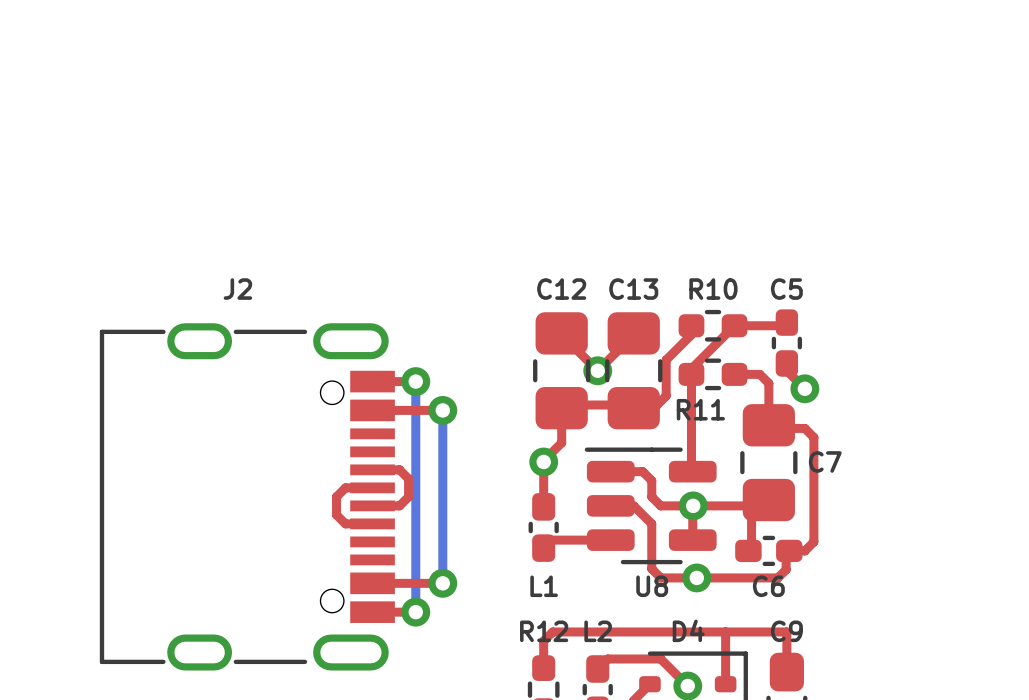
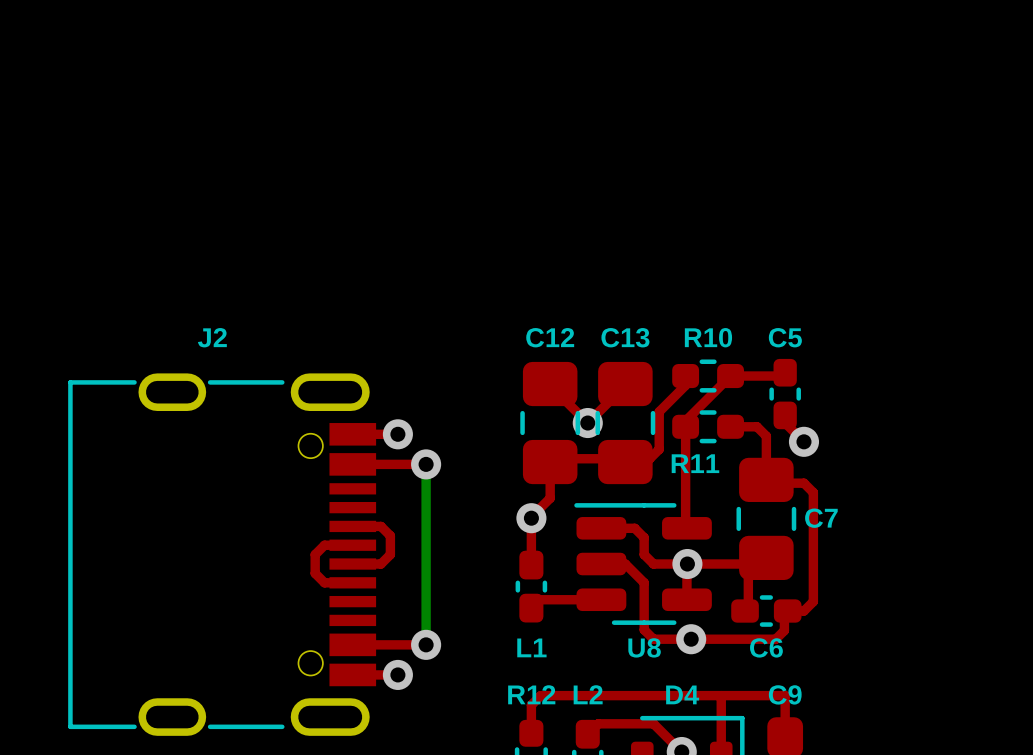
bottom track: (415, 381) (415, 612) -> none

